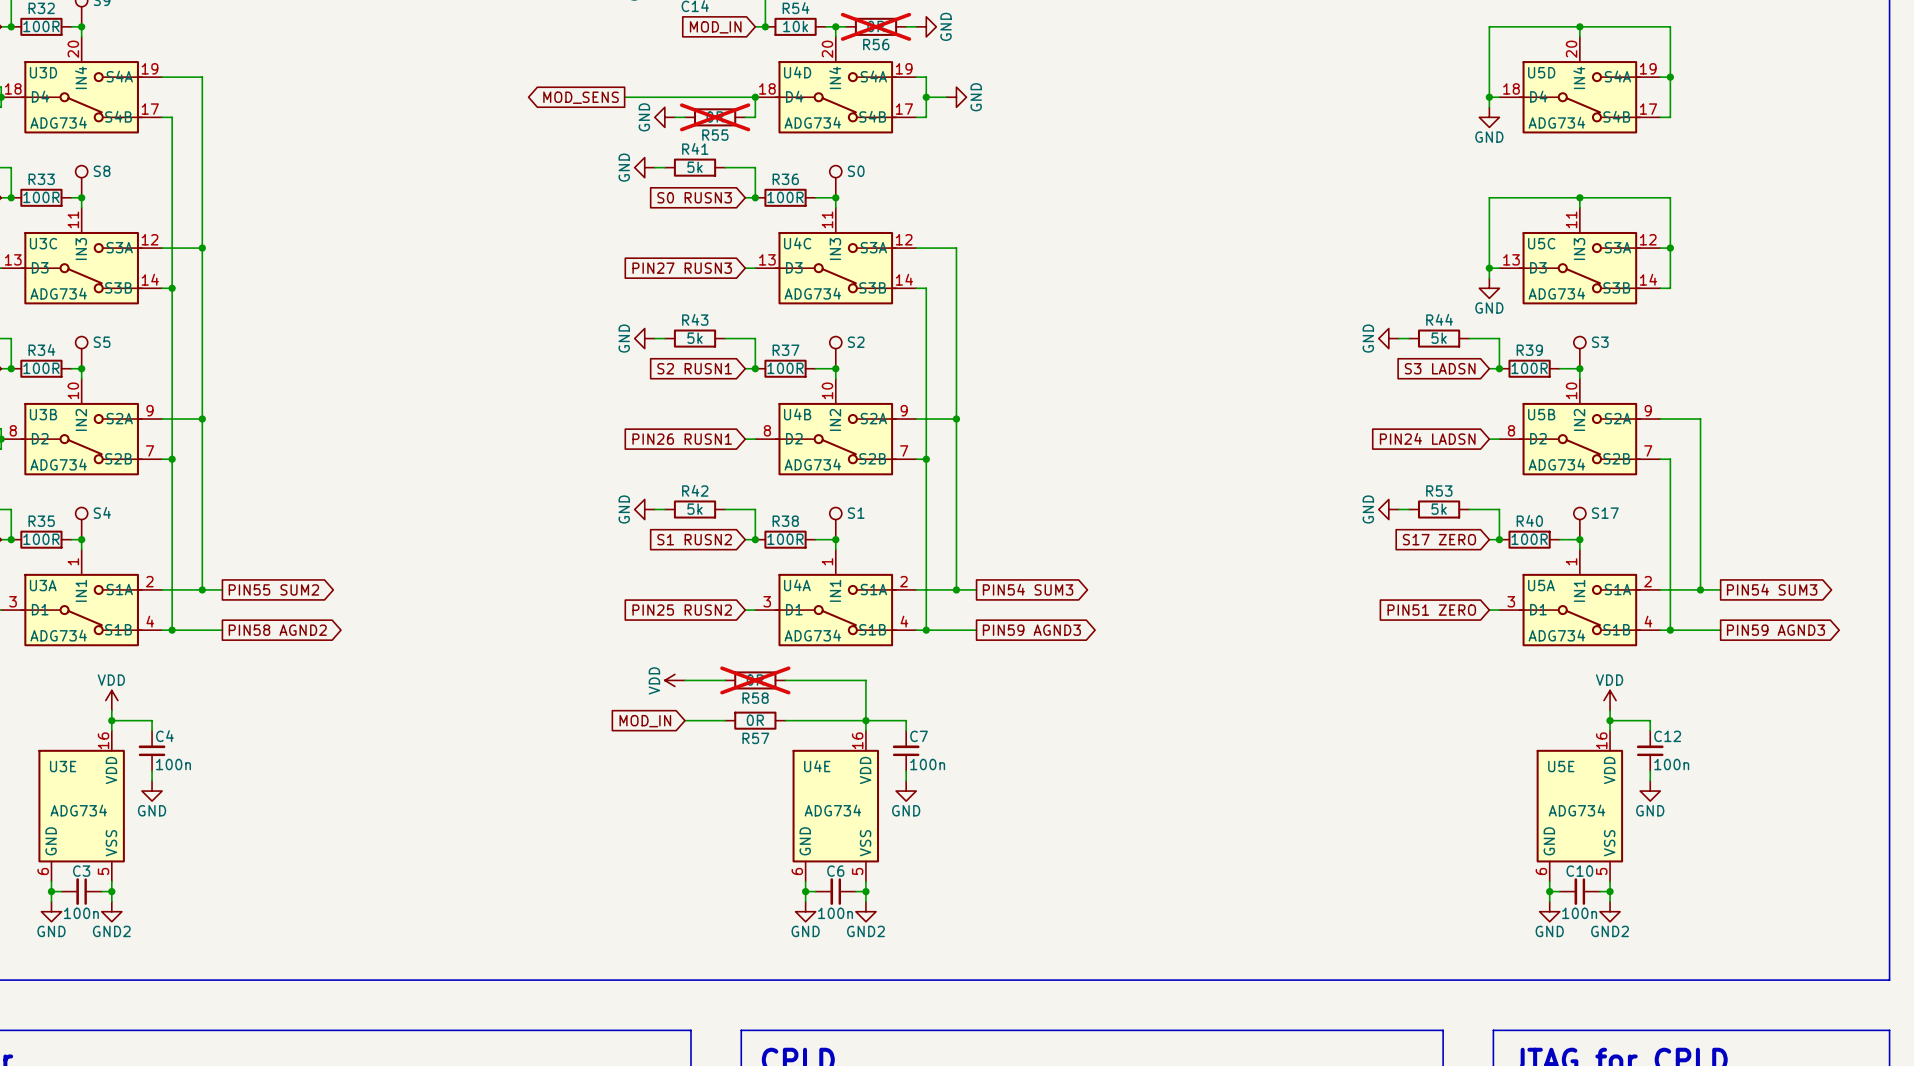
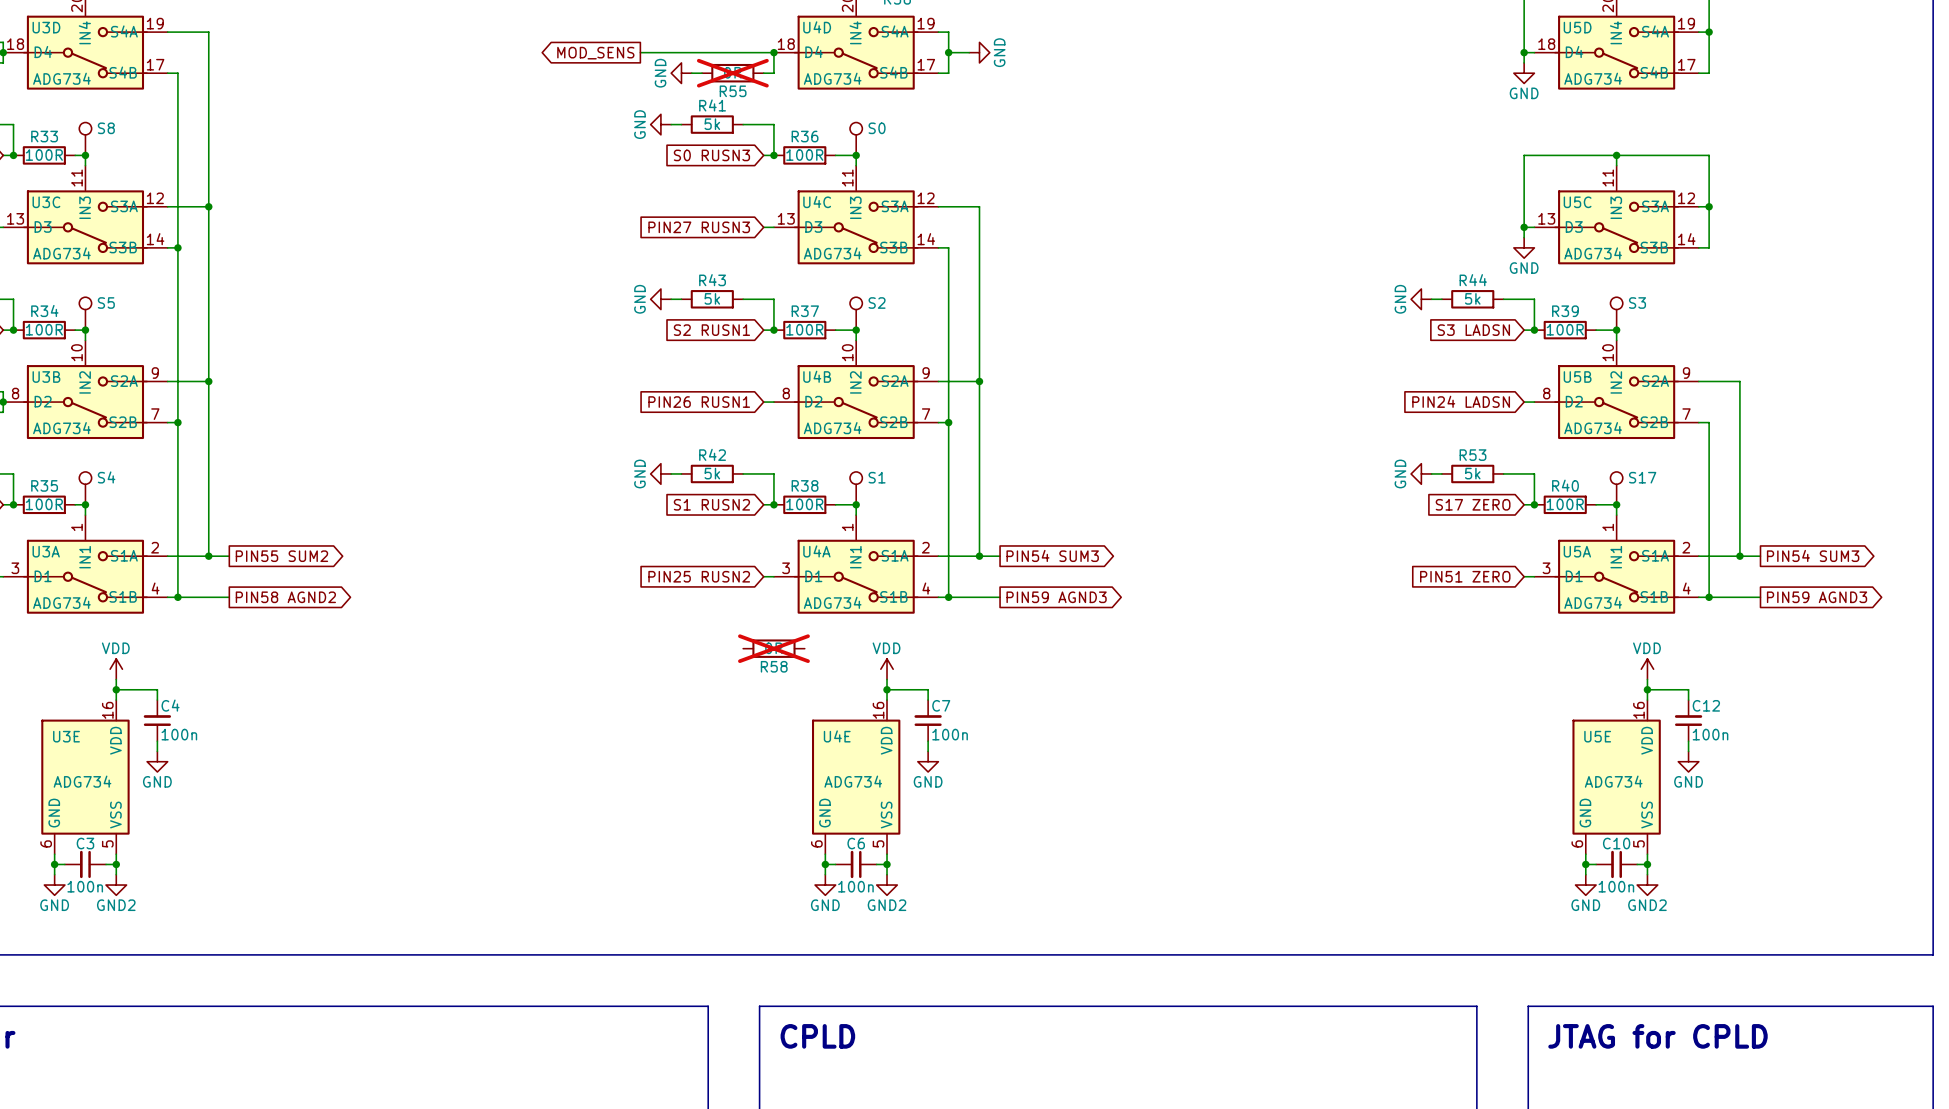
power symbol rotation: 0° (674, 680) -> 90° clockwise (887, 669)
power symbol position: VDD (674, 680) -> VDD (887, 669)
wire: (684, 680) (725, 680) -> none
wire: (785, 680) (865, 680) (865, 710) -> none
wire: (684, 720) (725, 720) -> none
R57: 0R (755, 720) -> none
wire: (785, 720) (865, 720) -> none
global label: MOD_IN (645, 721) -> none

